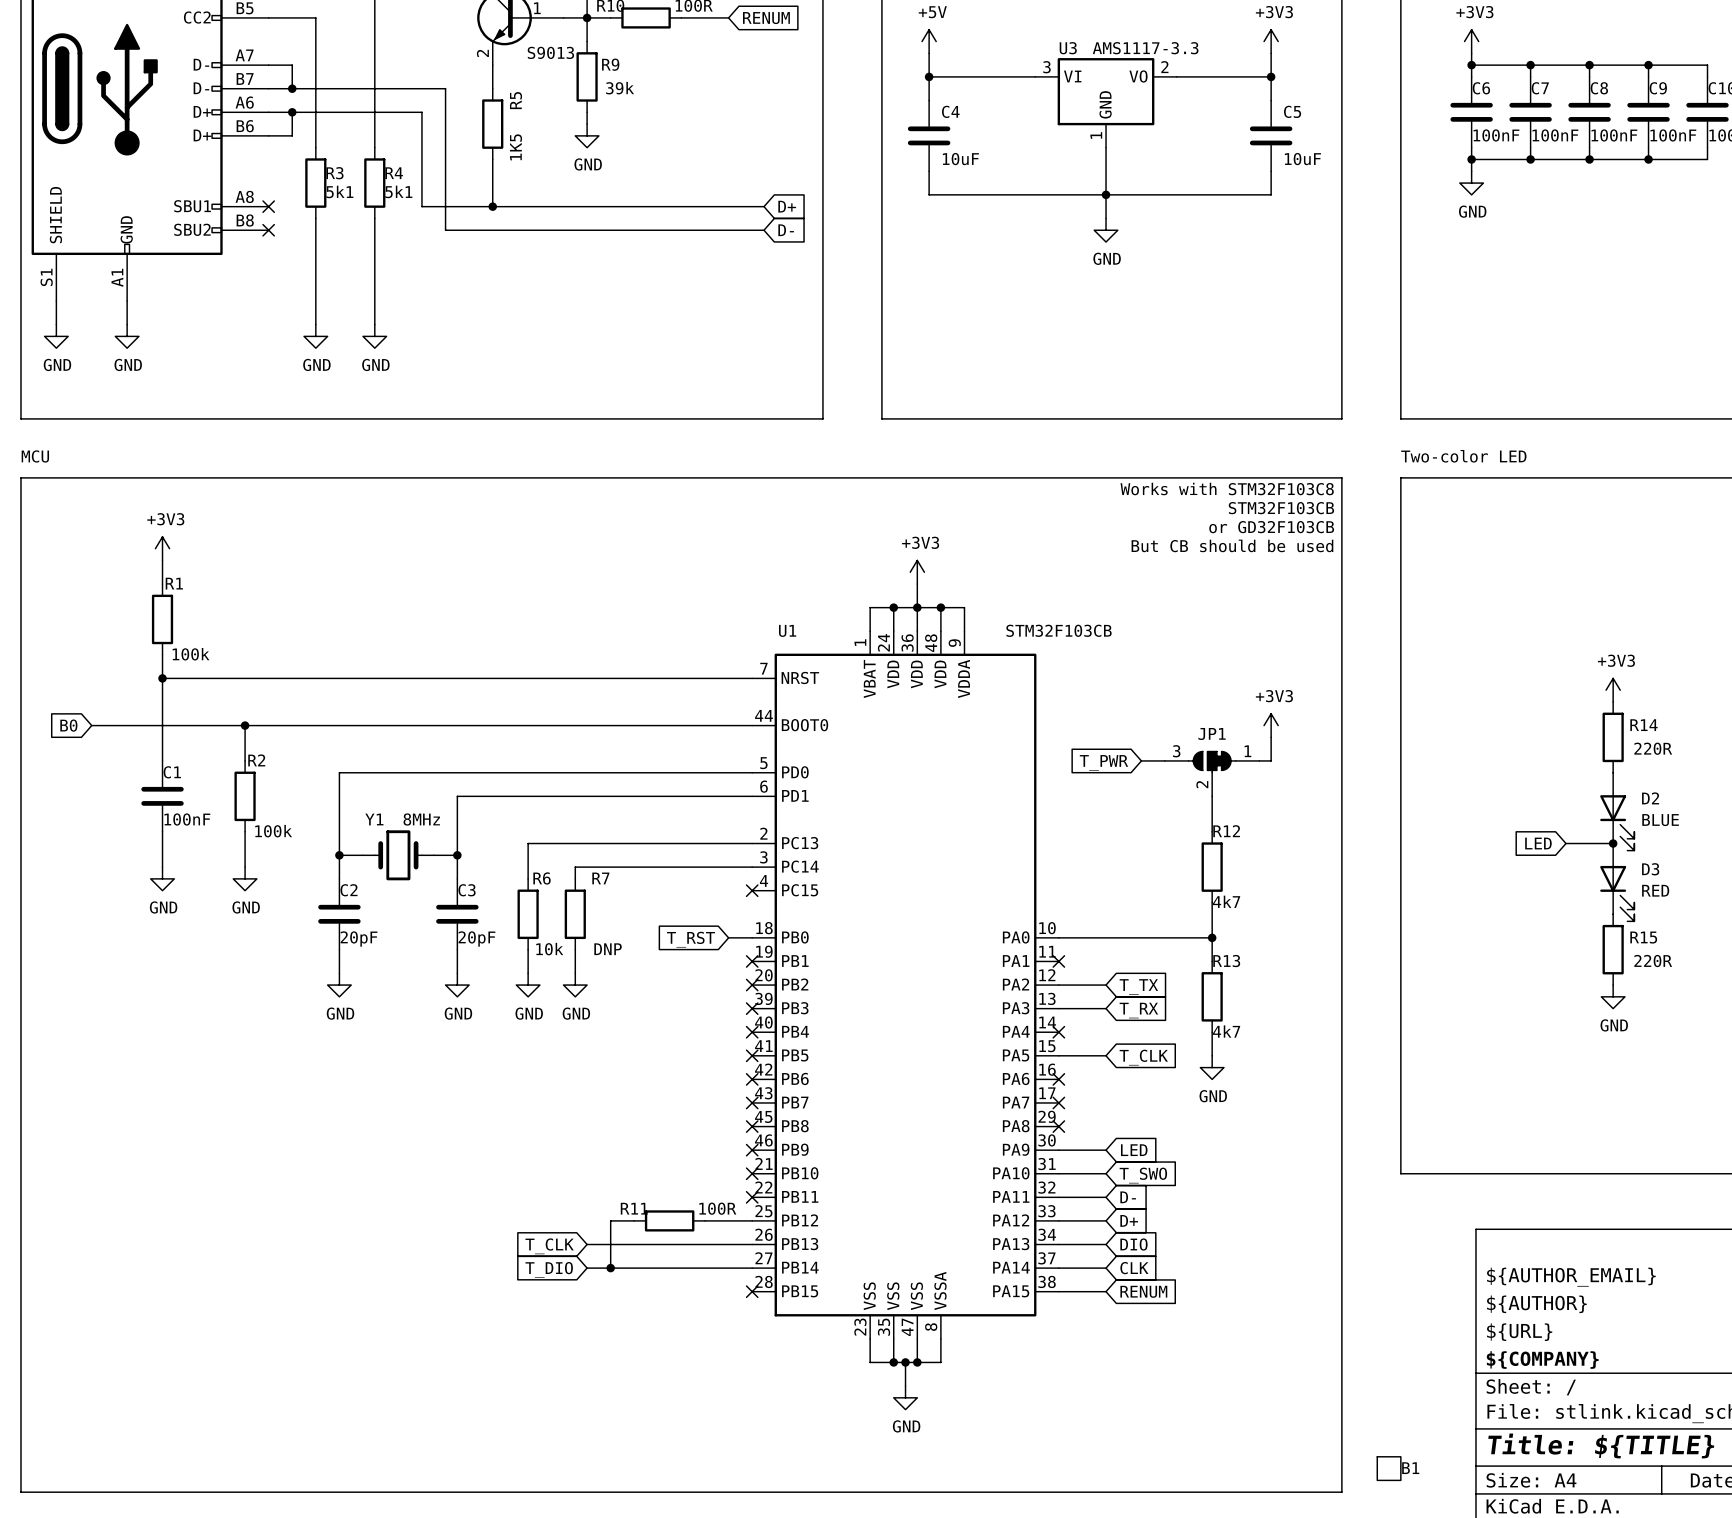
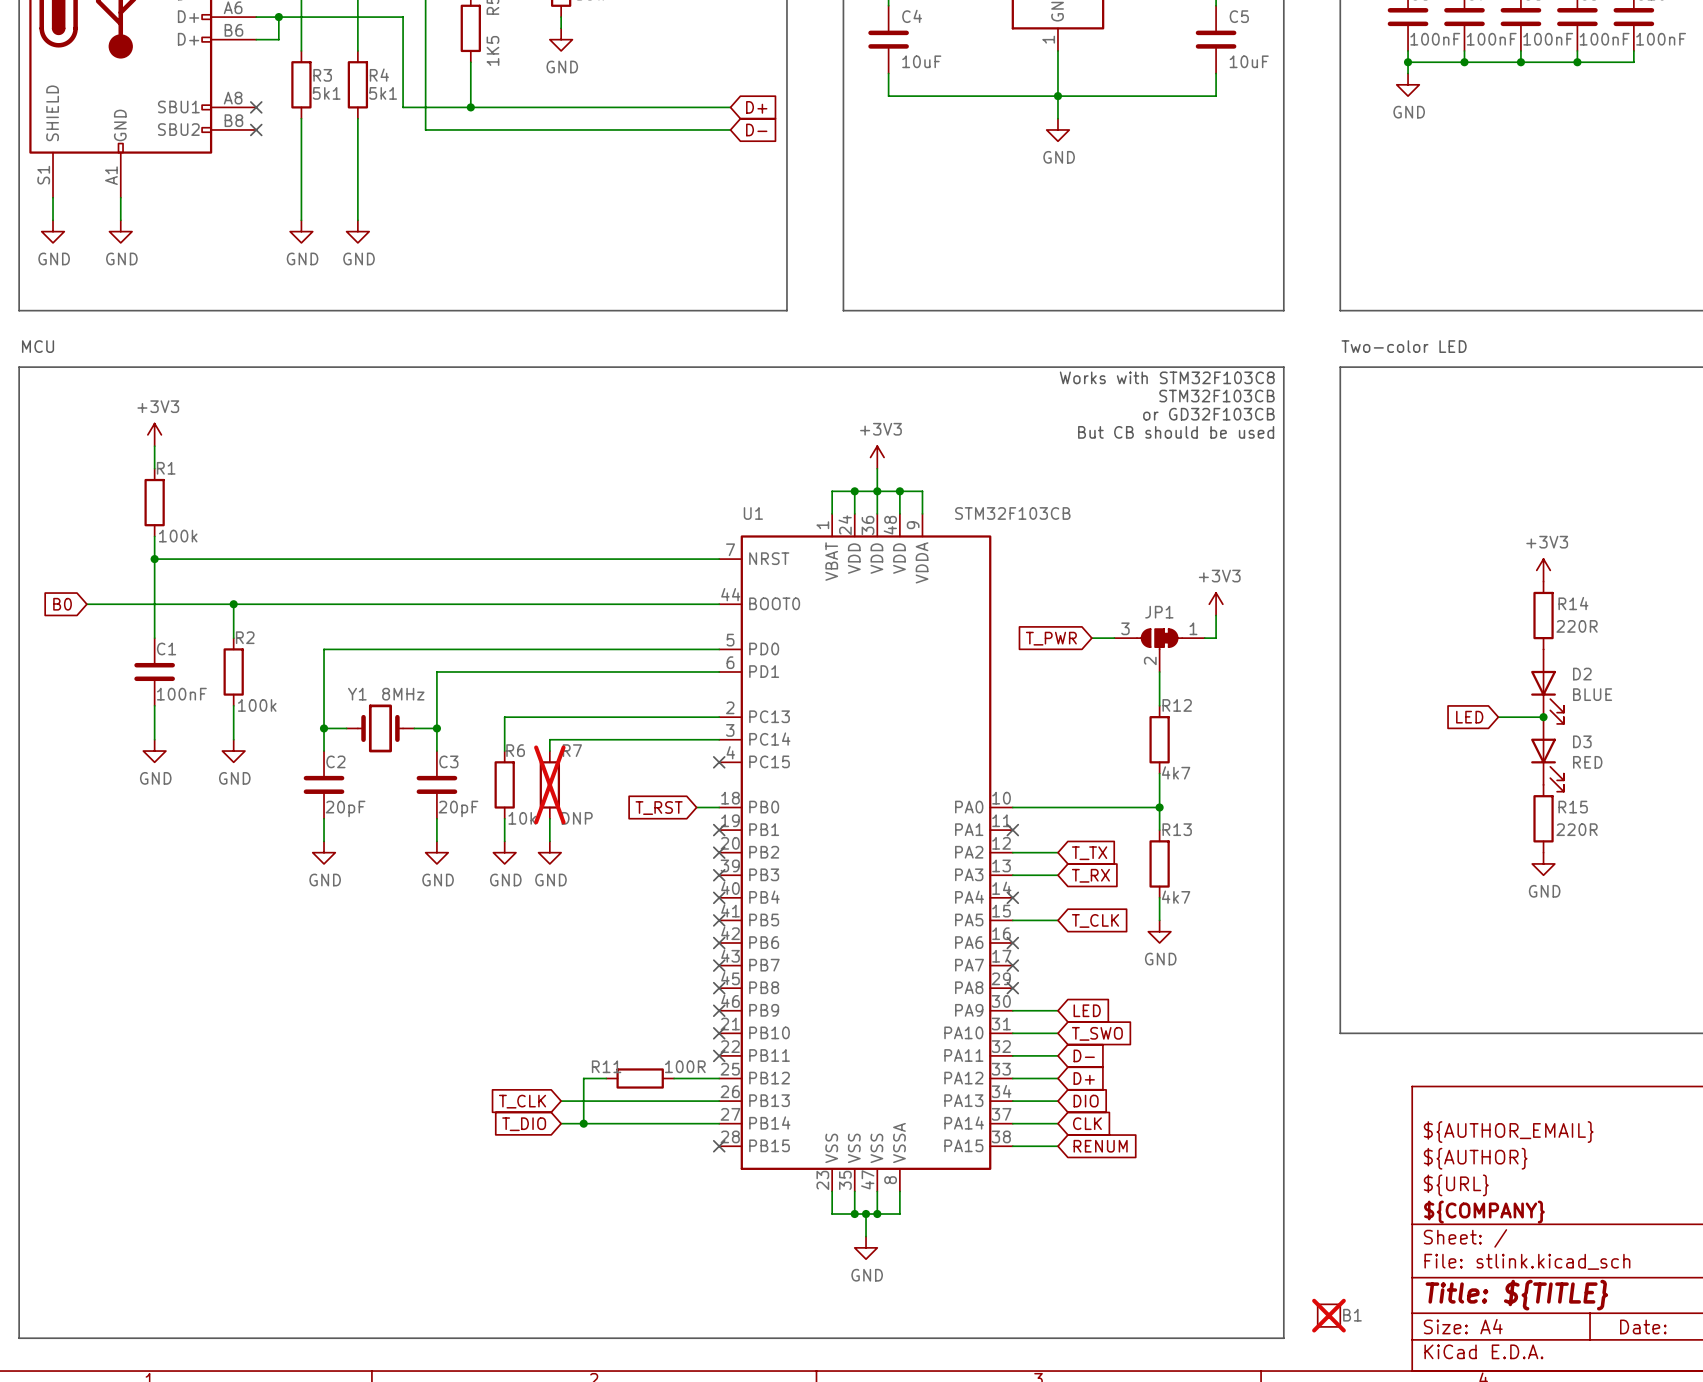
R7 do-not-place cross: none -> (549, 784)
B1 do-not-place cross: none -> (1328, 1315)

